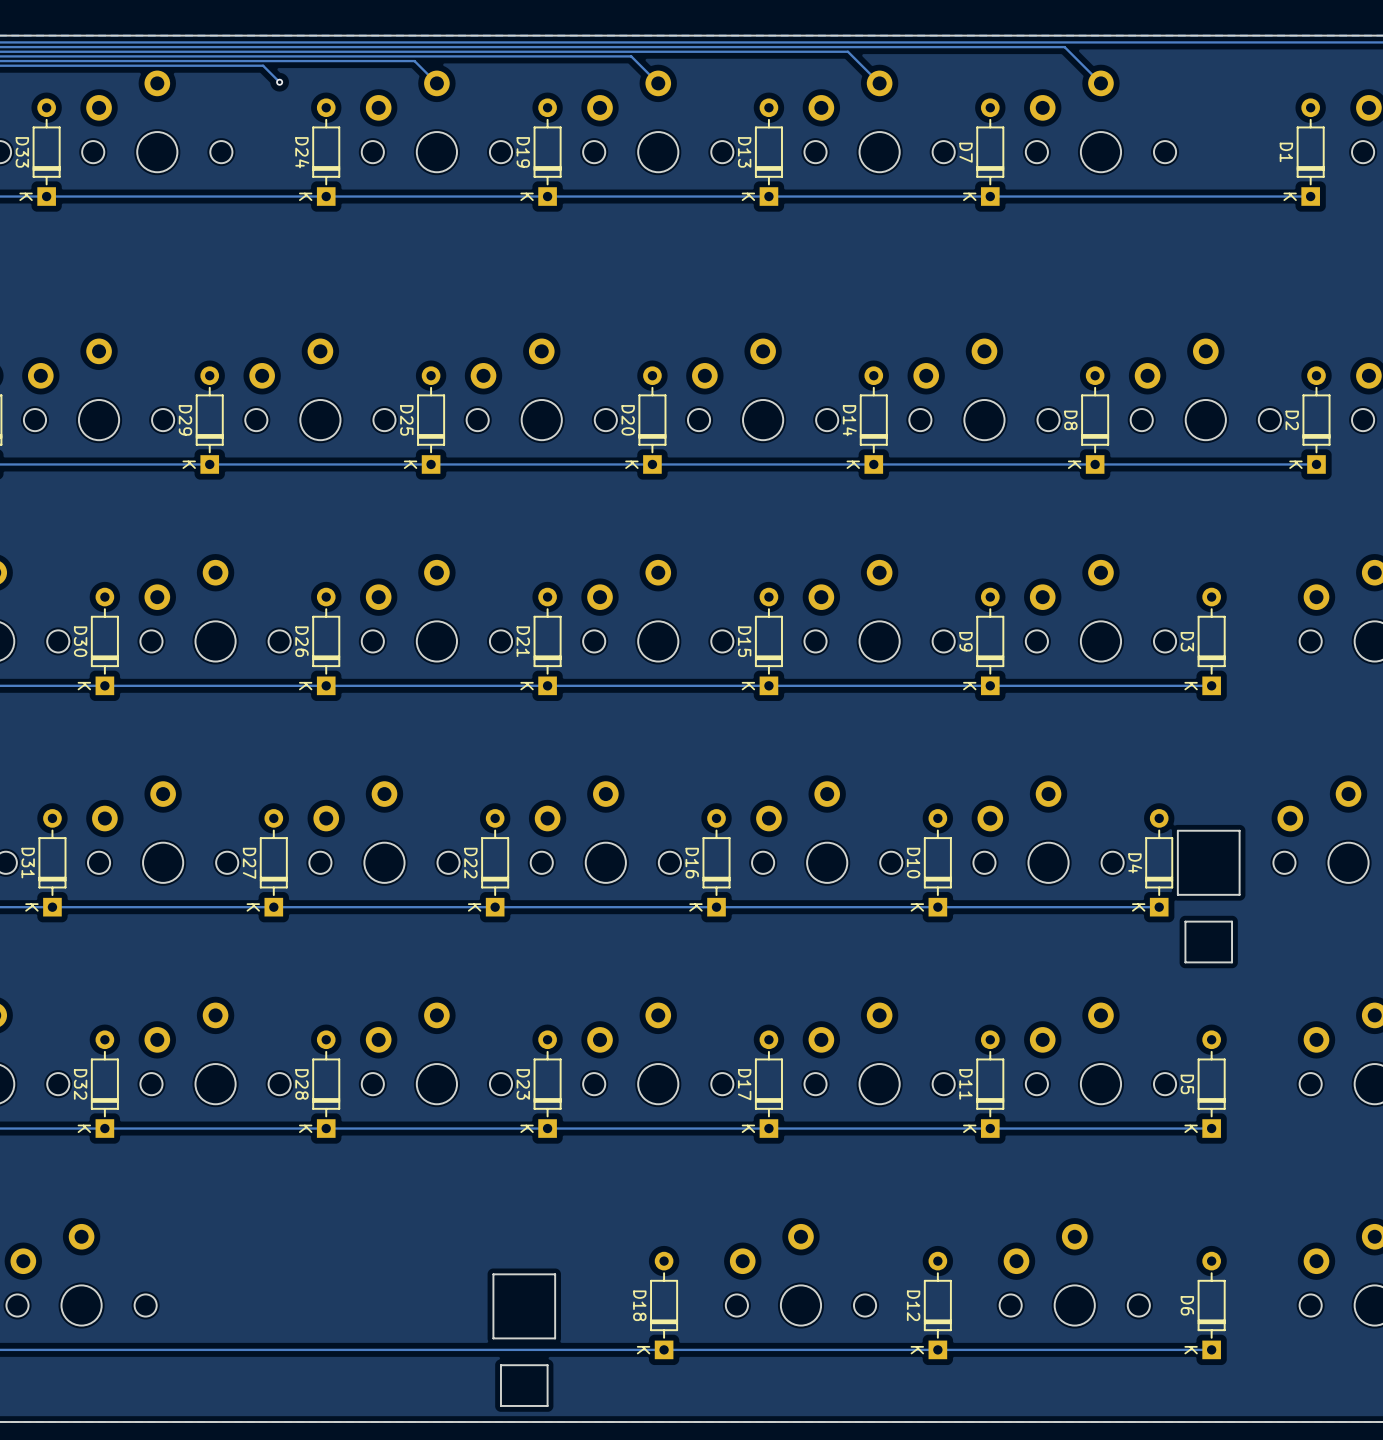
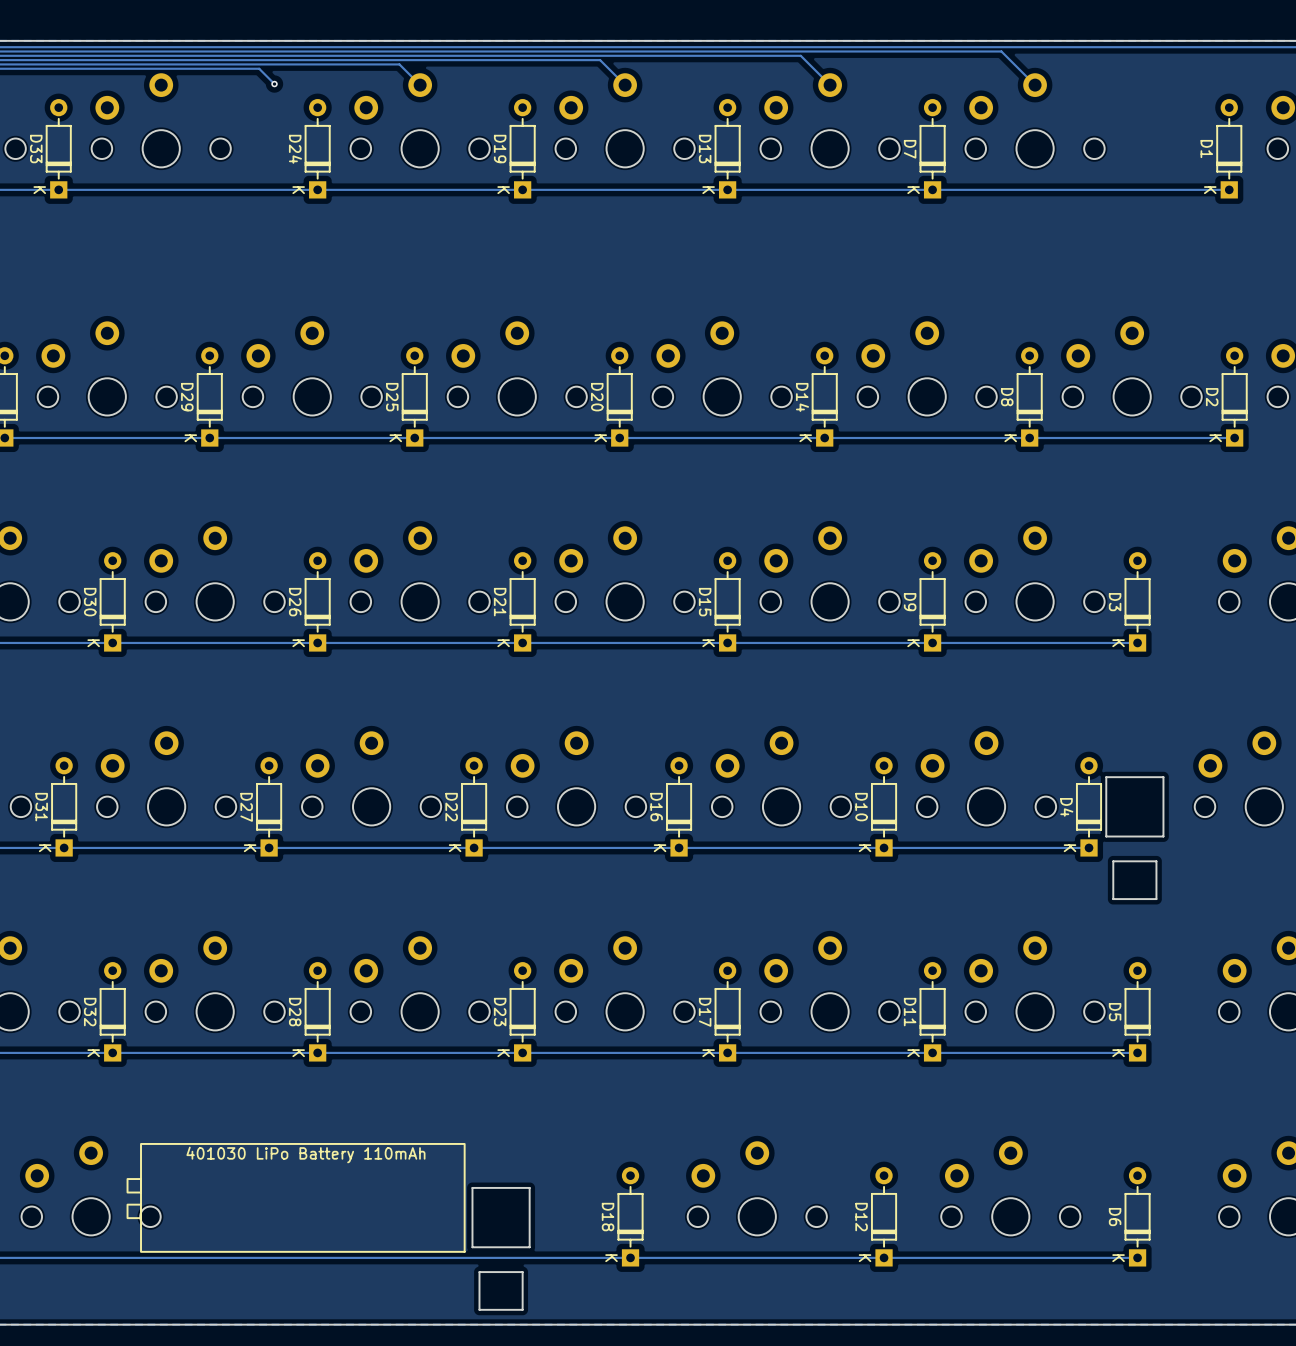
drawing: none -> [126, 1143, 466, 1253]

